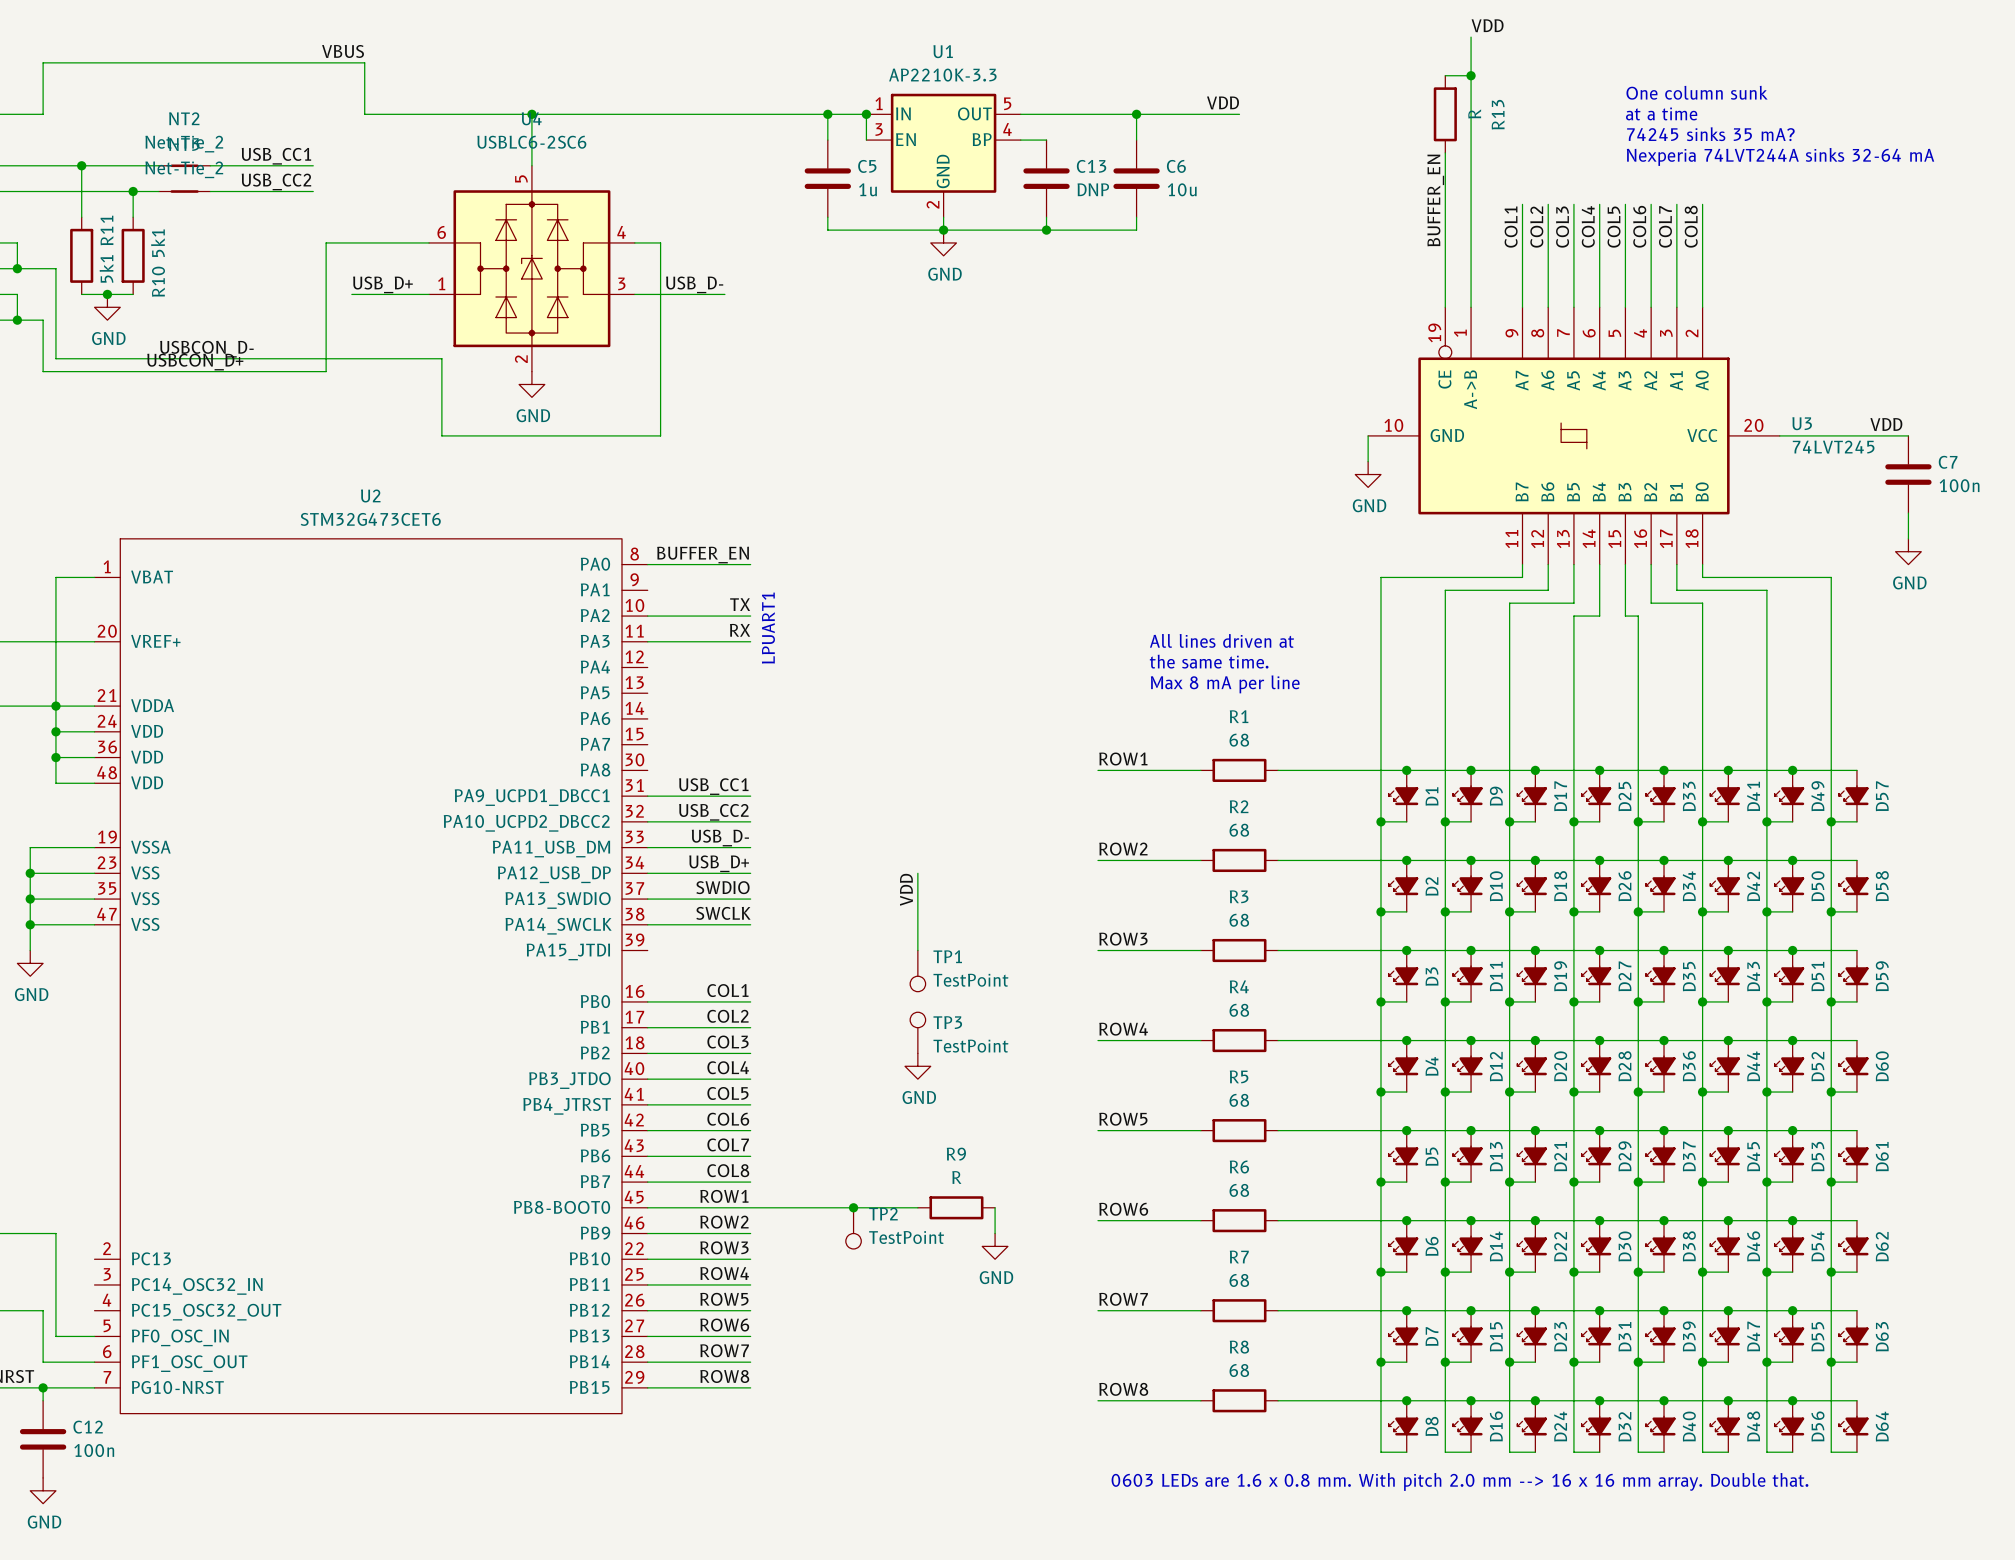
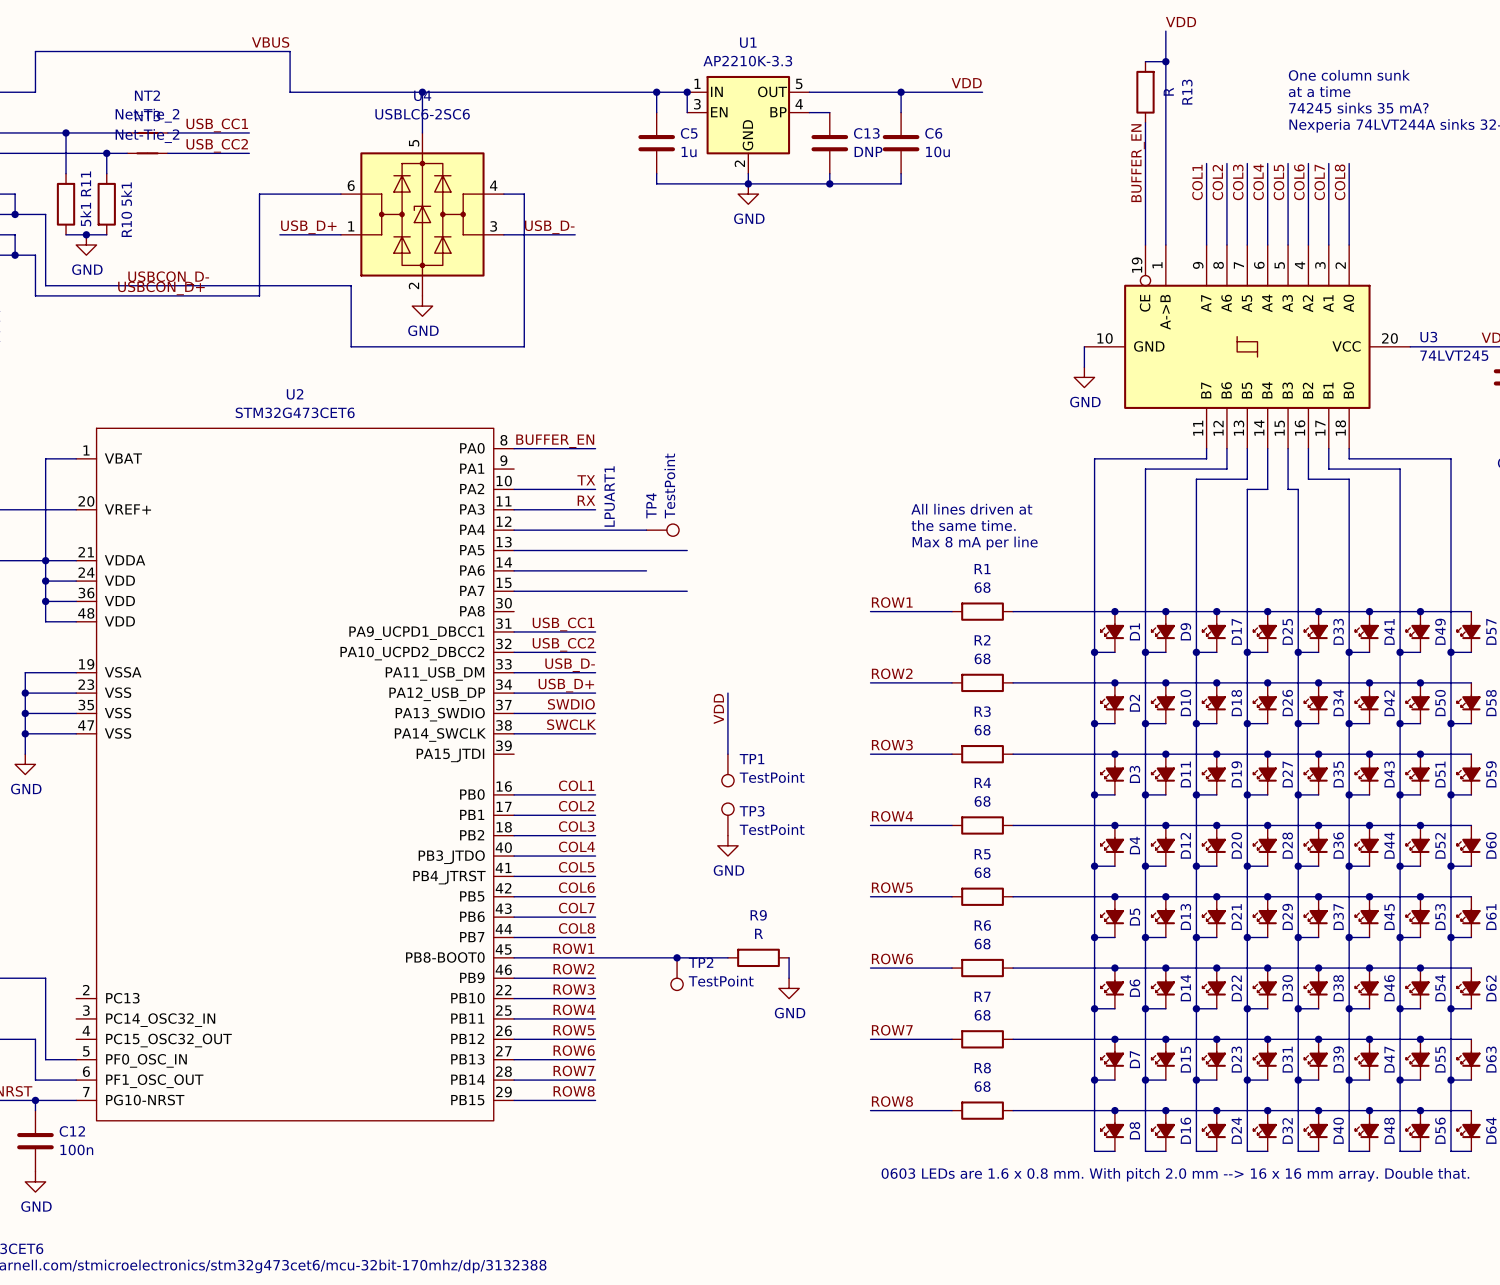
wire: none -> (514, 530) (646, 530)
TP4: none -> TestPoint (662, 530)
wire: none -> (514, 550) (687, 550)
wire: none -> (514, 570) (646, 570)
wire: none -> (514, 591) (687, 591)

